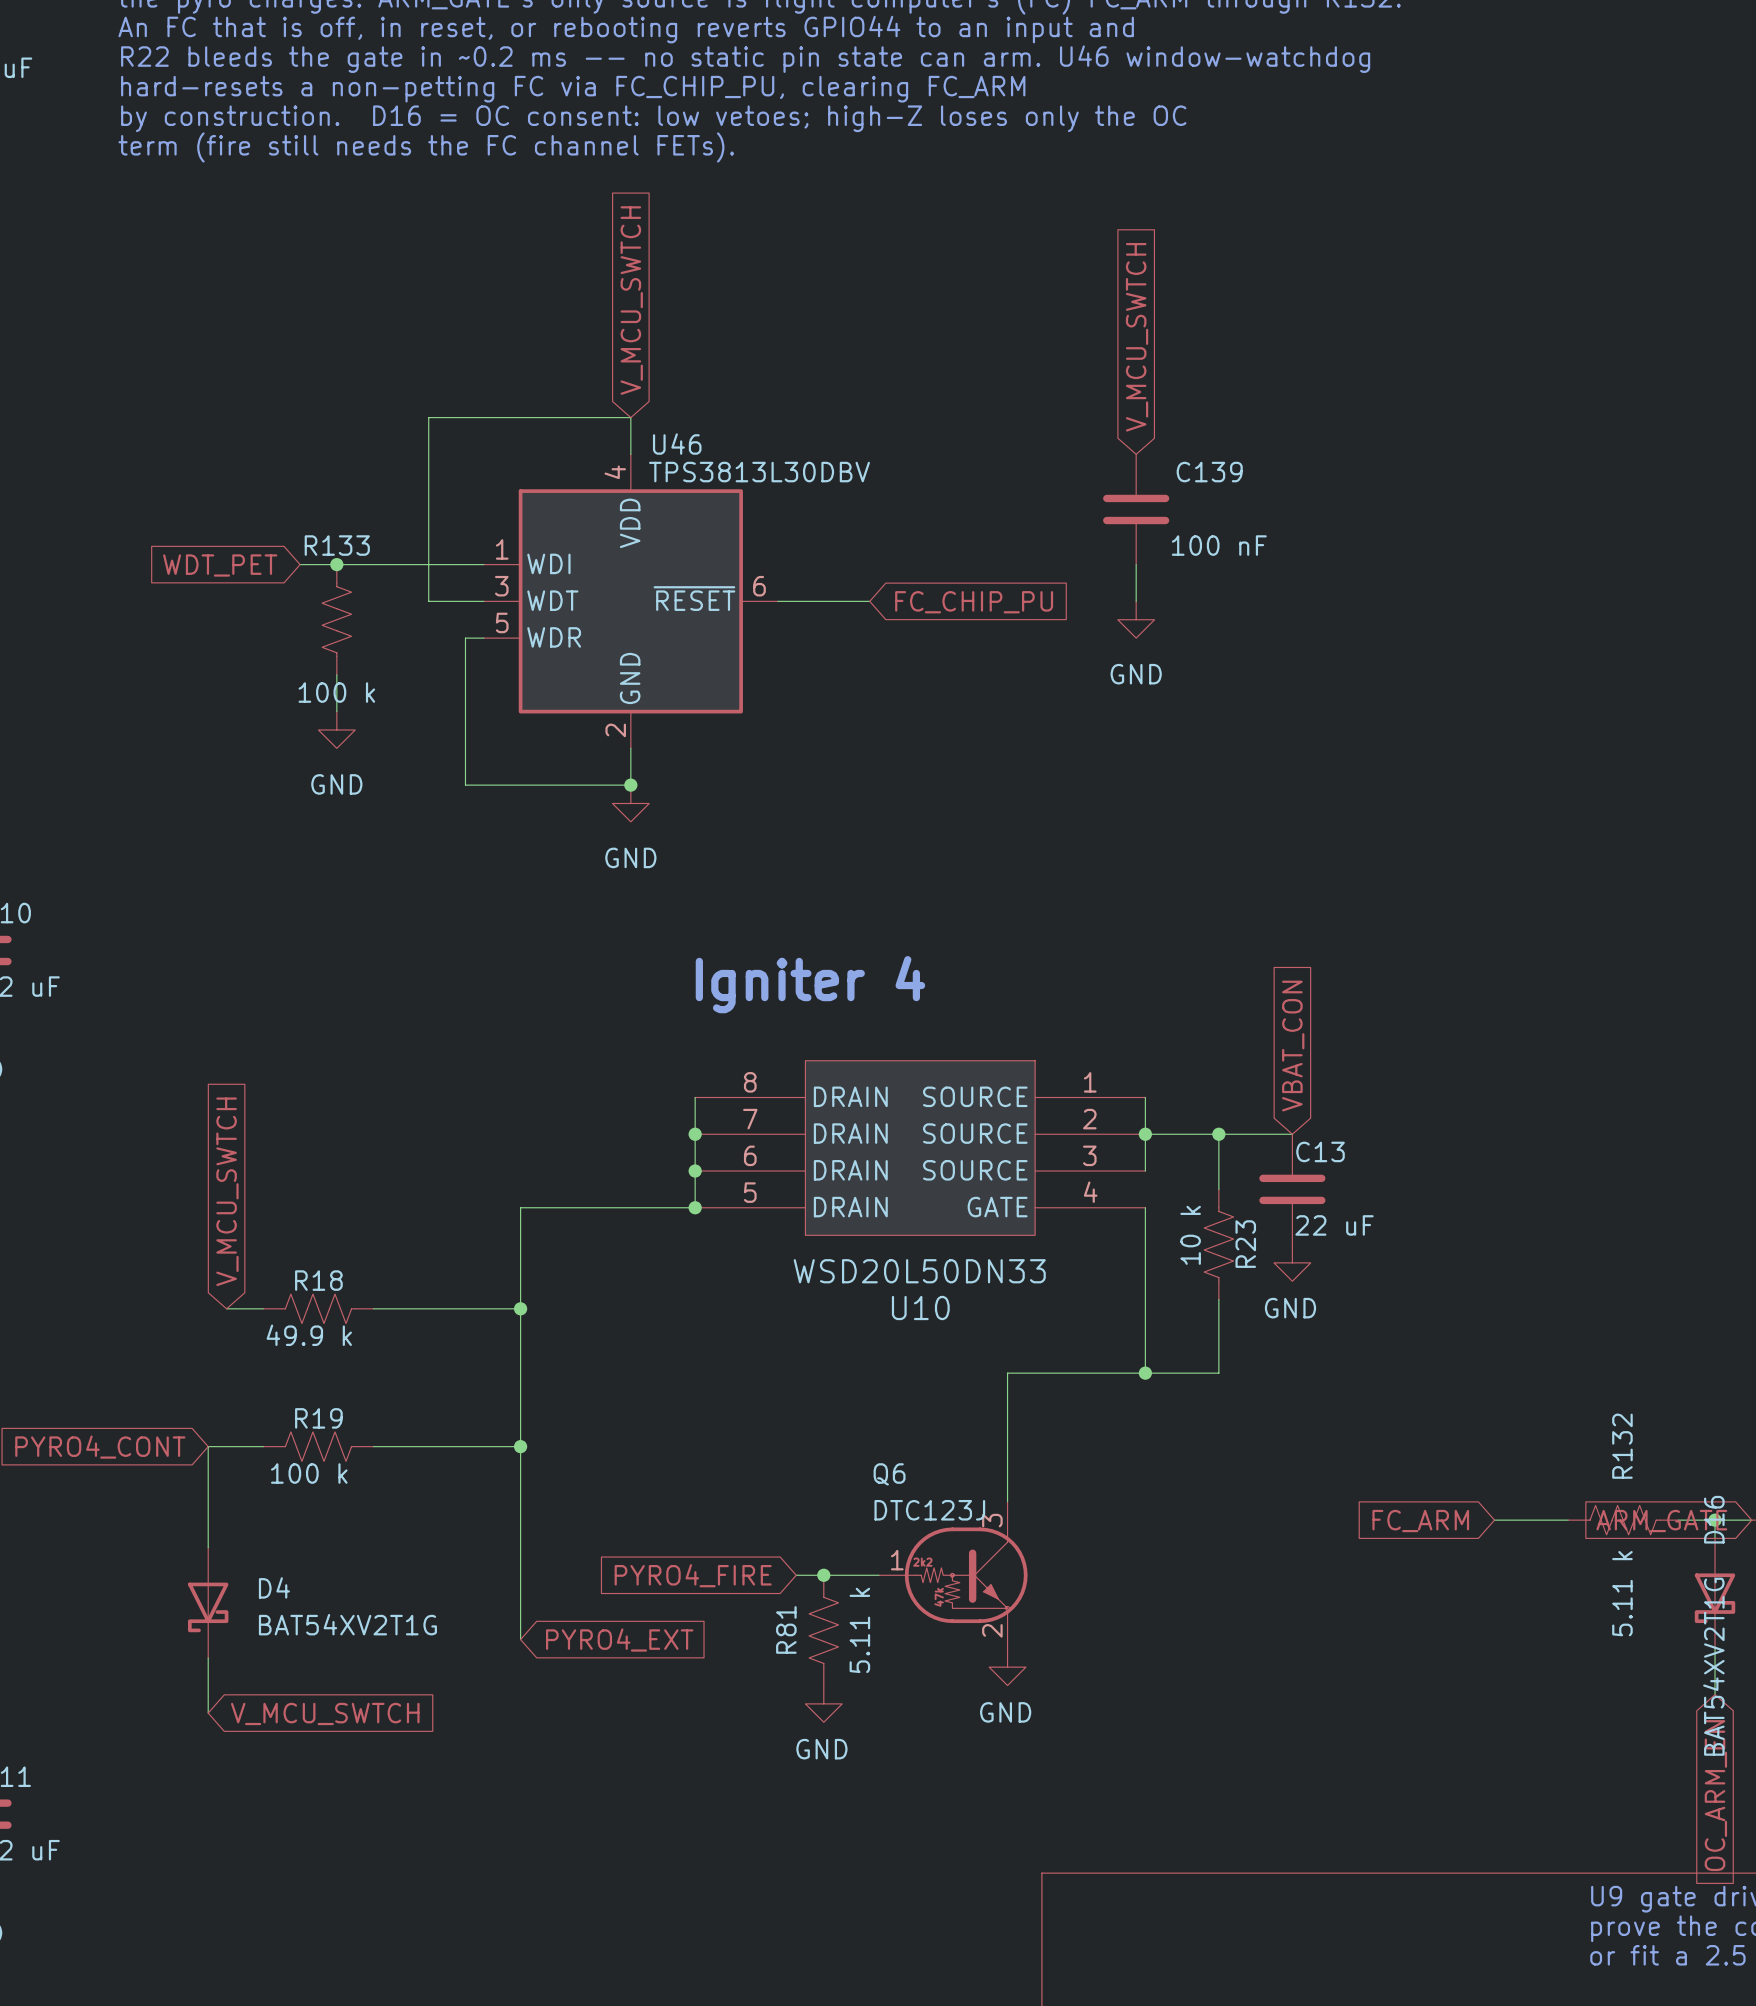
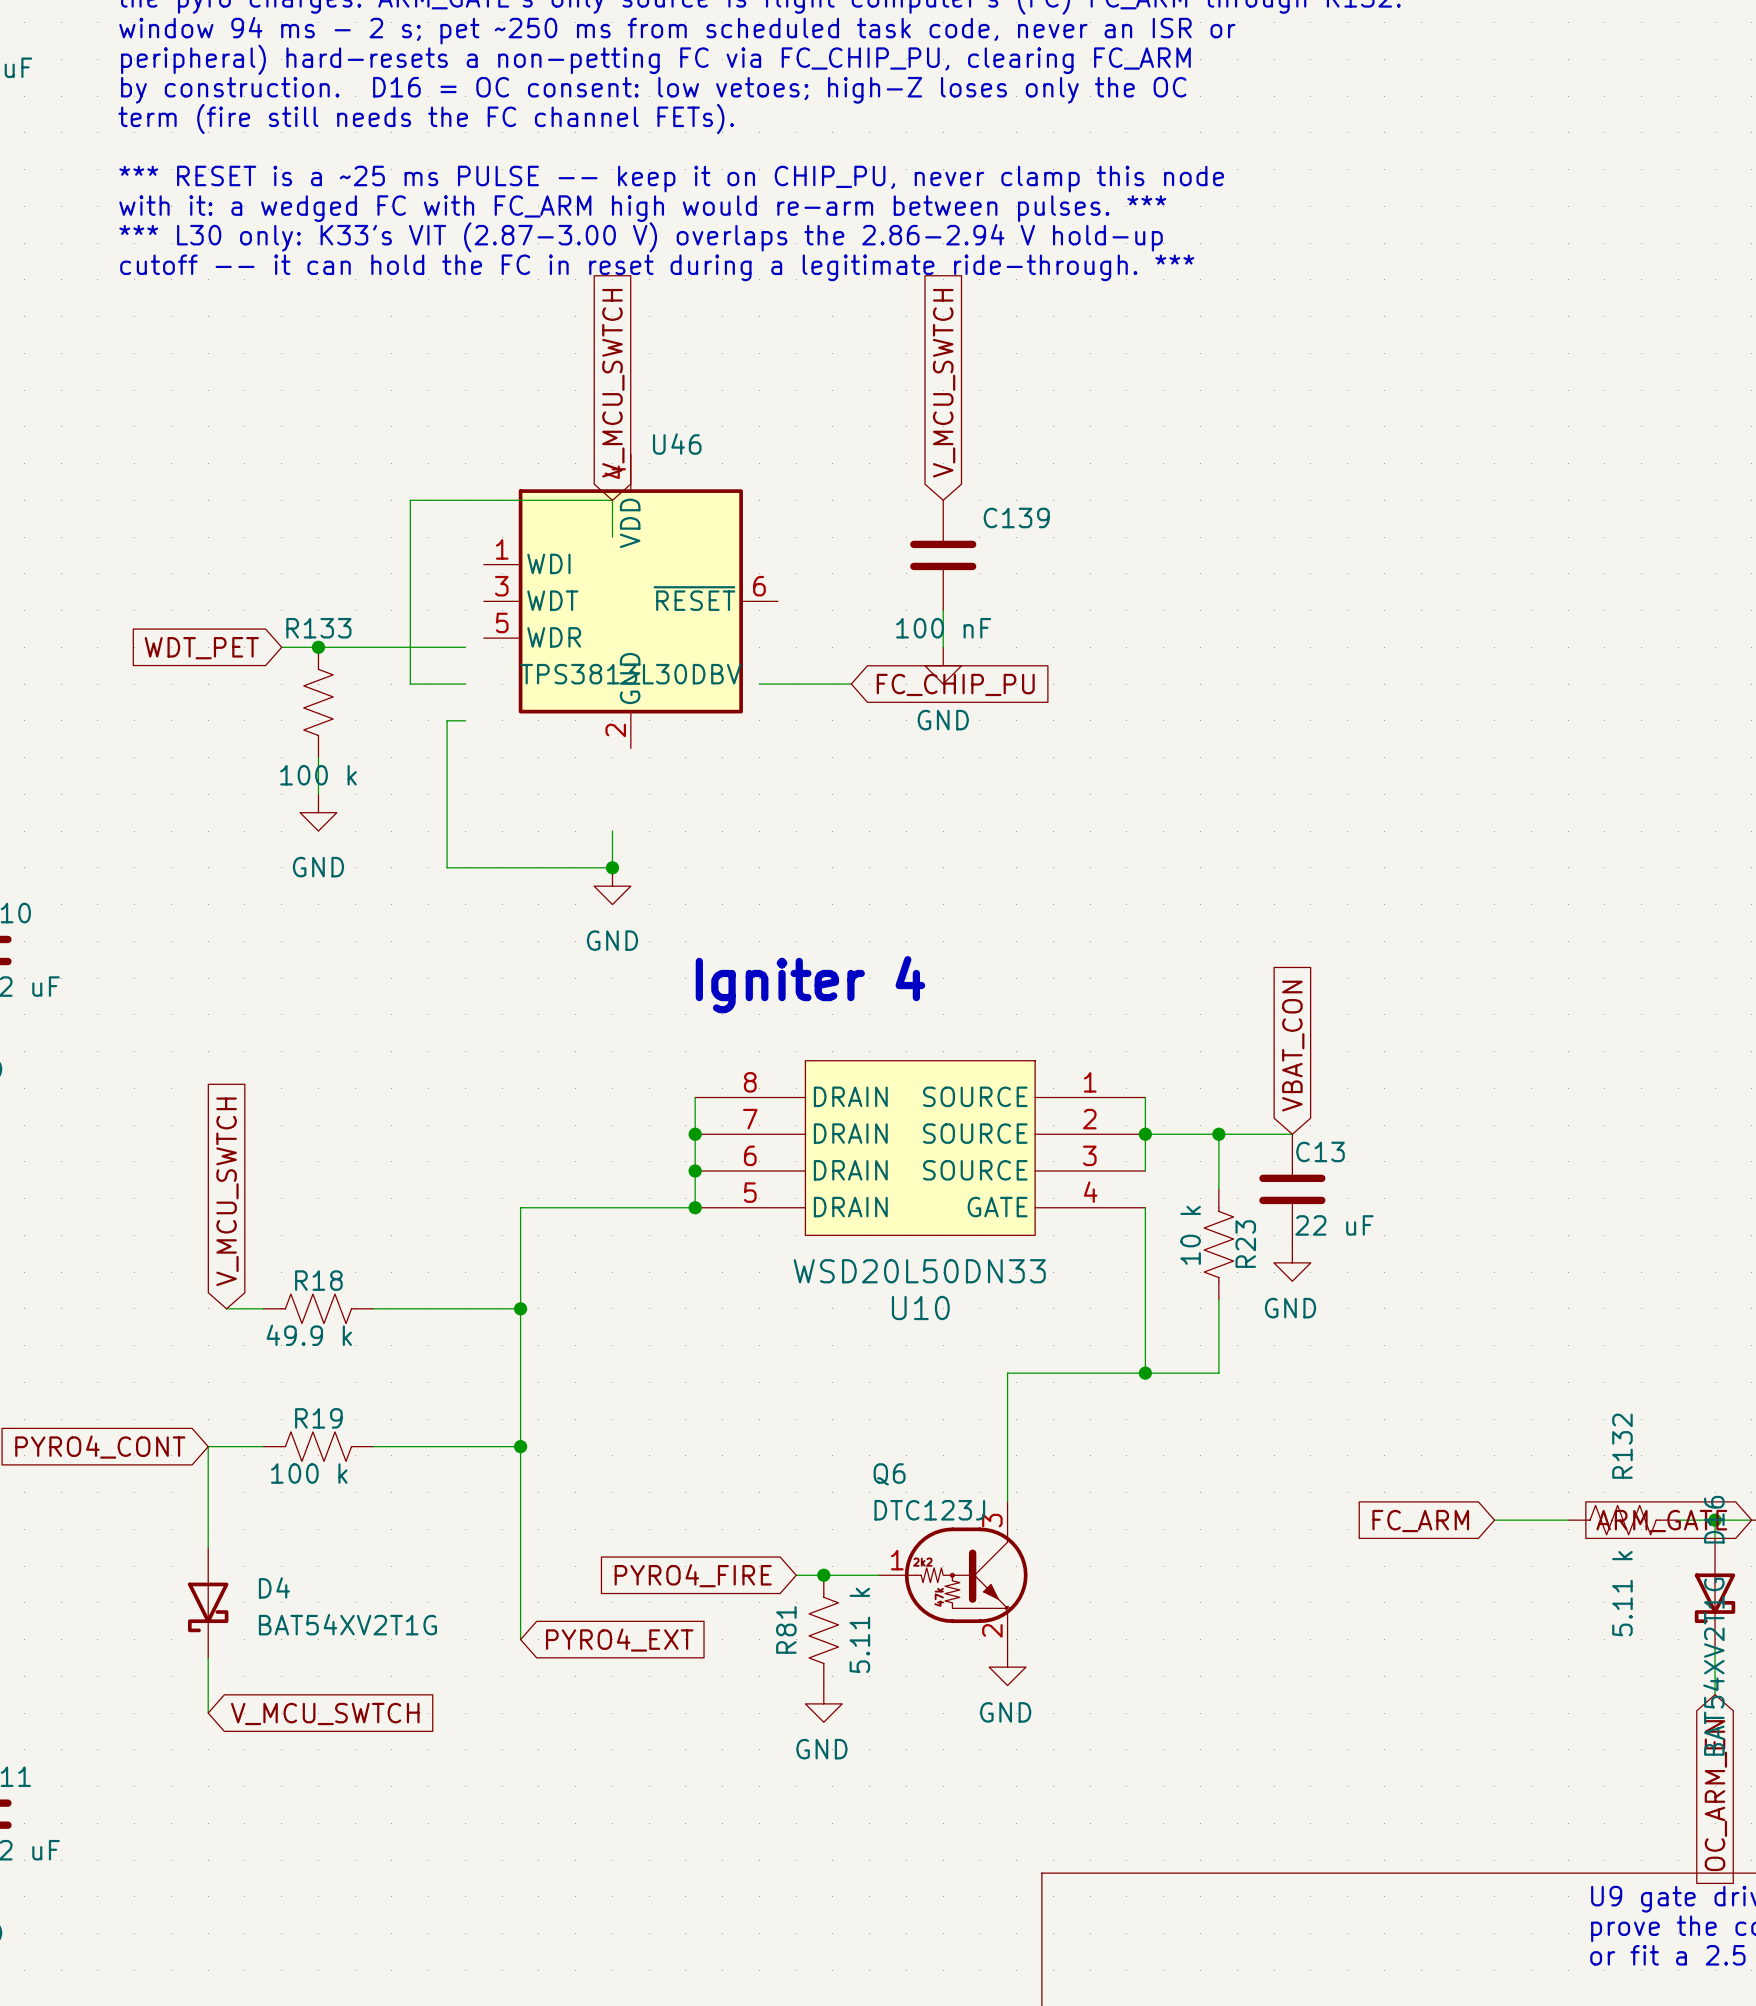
text: An FC that is off, in reset, or rebooting reverts GPIO44 to an input and (626, 29) -> window 94 ms - 2 s; pet ~250 ms from scheduled task code, never an ISR or (677, 30)
text: R22 bleeds the gate in ~0.2 ms -- no static pin state can arm. U46 window-watchdog (745, 59) -> peripheral) hard-resets a non-petting FC via FC_CHIP_PU, clearing FC_ARM (655, 59)
text: hard-resets a non-petting FC via FC_CHIP_PU, clearing FC_ARM (573, 89) -> by construction. D16 = OC consent: low vetoes; high-Z loses only the OC (653, 90)
text: by construction. D16 = OC consent: low vetoes; high-Z loses only the OC (653, 118) -> term (fire still needs the FC channel FETs). (426, 118)
text: term (fire still needs the FC channel FETs). (426, 147) -> none
text: none -> *** RESET is a ~25 ms PULSE -- keep it on CHIP_PU, never clamp this node (671, 179)
text: none -> with it: a wedged FC with FC_ARM high would re-arm between pulses. *** (642, 208)
text: none -> *** L30 only: K33's VIT (2.87-3.00 V) overlaps the 2.86-2.94 V hold-up (641, 237)
text: none -> cutoff -- it can hold the FC in reset during a legitimate ride-through. *** (657, 267)
global label position: V_MCU_SWTCH (631, 300) -> V_MCU_SWTCH (613, 383)
global label: V_MCU_SWTCH (1137, 337) -> none
global label: none -> V_MCU_SWTCH (944, 383)
wire: (630, 454) (630, 417) (428, 417) (428, 601) (483, 601) -> (612, 537) (612, 500) (410, 500) (410, 684) (465, 684)
U46 value position: TPS3813L30DBV (759, 472) -> TPS3813L30DBV (630, 674)
C139 position: (1136, 509) -> (943, 555)
C139 value position: 100 nF (1219, 545) -> 100 nF (943, 628)
wire: (300, 564) (483, 564) -> (281, 647) (465, 647)
junction position: (336, 564) -> (318, 647)
wire: (1136, 564) (1136, 601) -> (943, 610) (943, 647)
global label position: WDT_PET (220, 565) -> WDT_PET (201, 648)
wire: (777, 601) (869, 601) -> (759, 684) (851, 684)
global label position: FC_CHIP_PU (974, 602) -> FC_CHIP_PU (955, 684)
R133 position: (336, 619) -> (318, 702)
power symbol: GND (1136, 619) -> none
wire: (483, 638) (465, 638) (465, 785) (630, 785) (630, 748) -> (465, 720) (447, 720) (447, 867) (612, 867) (612, 831)
power symbol: none -> GND (943, 665)
wire: (336, 674) (336, 711) -> (318, 757) (318, 794)
power symbol position: GND (336, 729) -> GND (318, 812)
junction position: (630, 785) -> (612, 867)
power symbol position: GND (630, 803) -> GND (612, 886)

